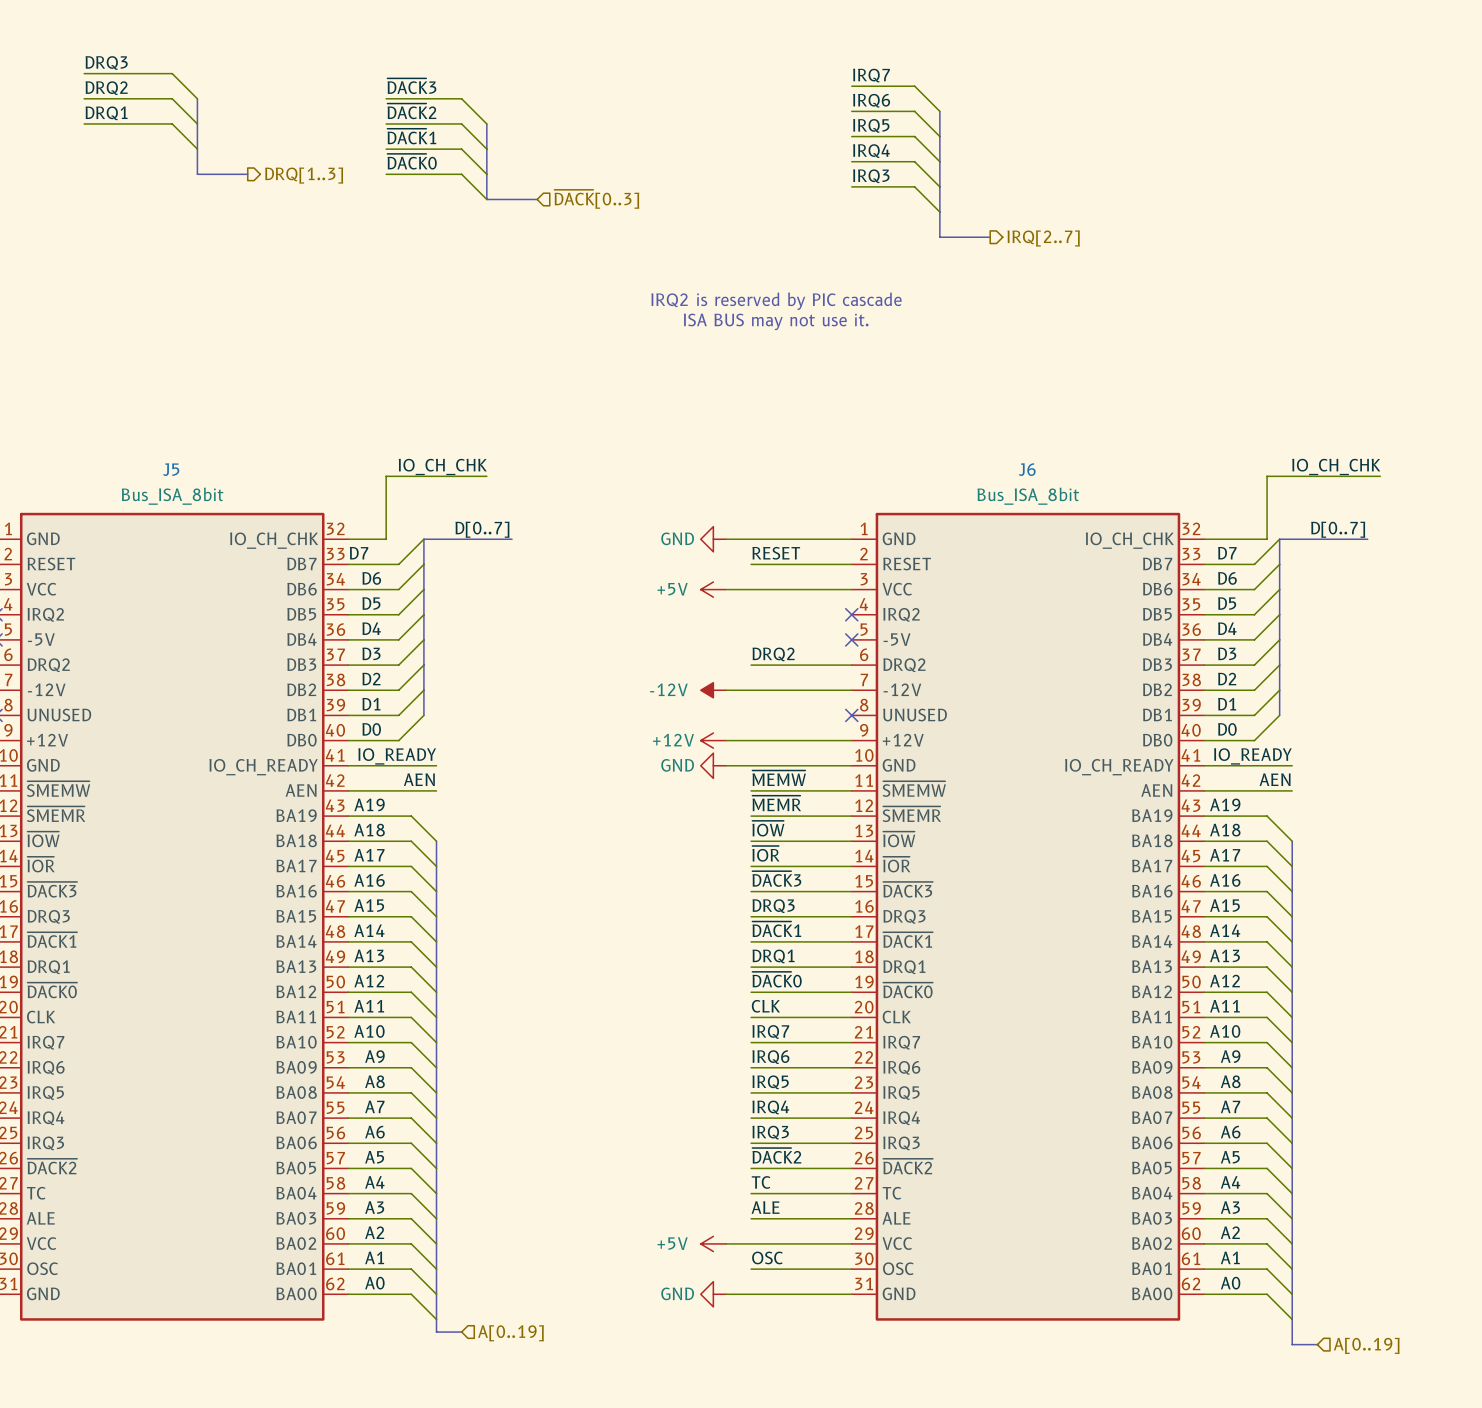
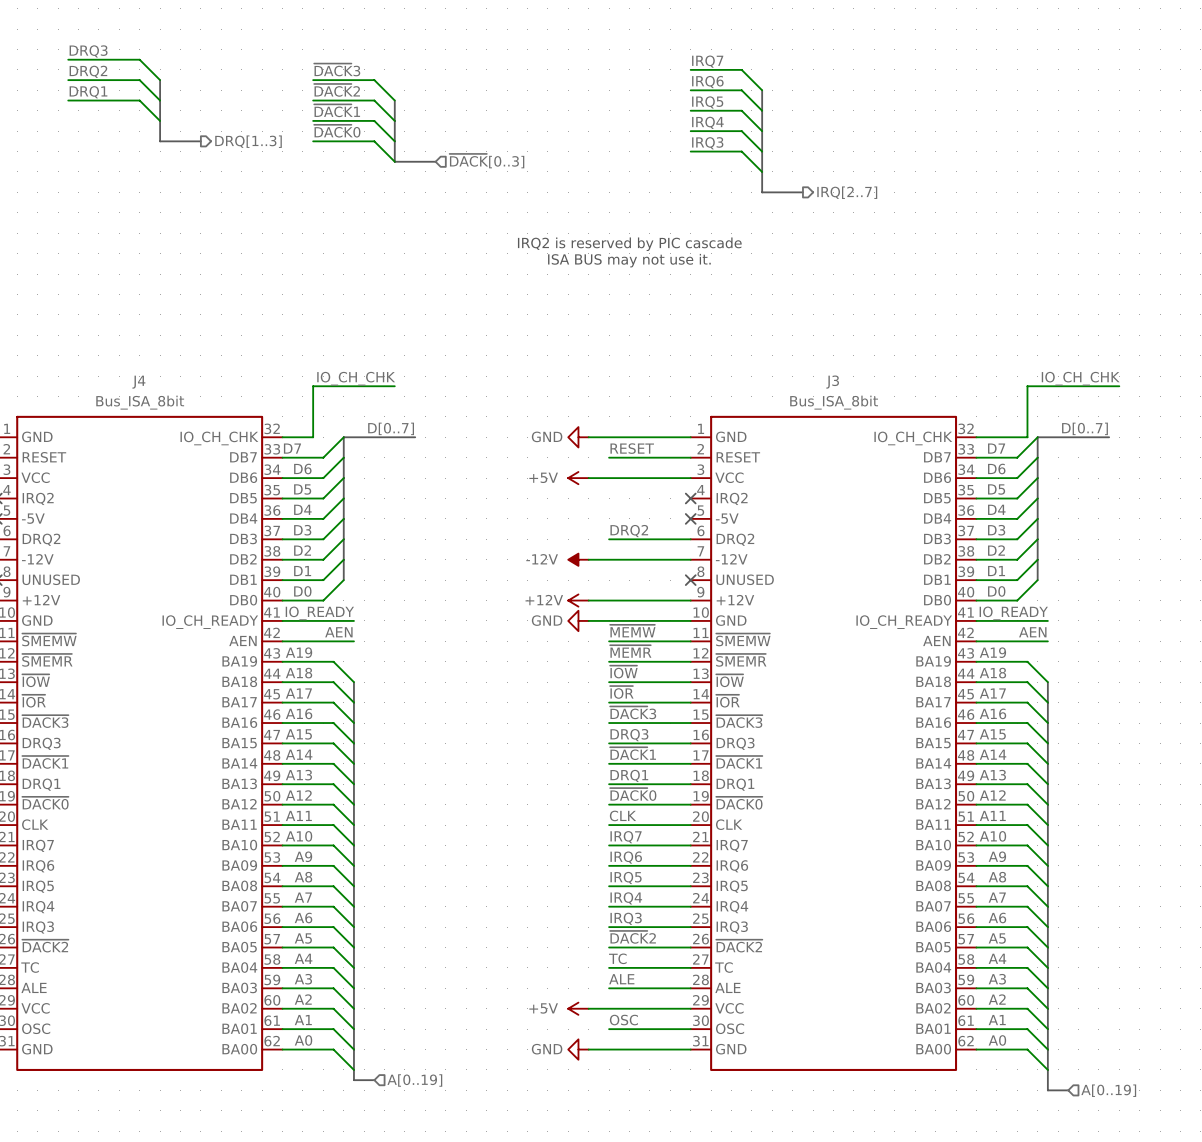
J5 name: J5 (171, 469) -> J4 (138, 382)
J6 name: J6 (1027, 469) -> J3 (832, 382)

